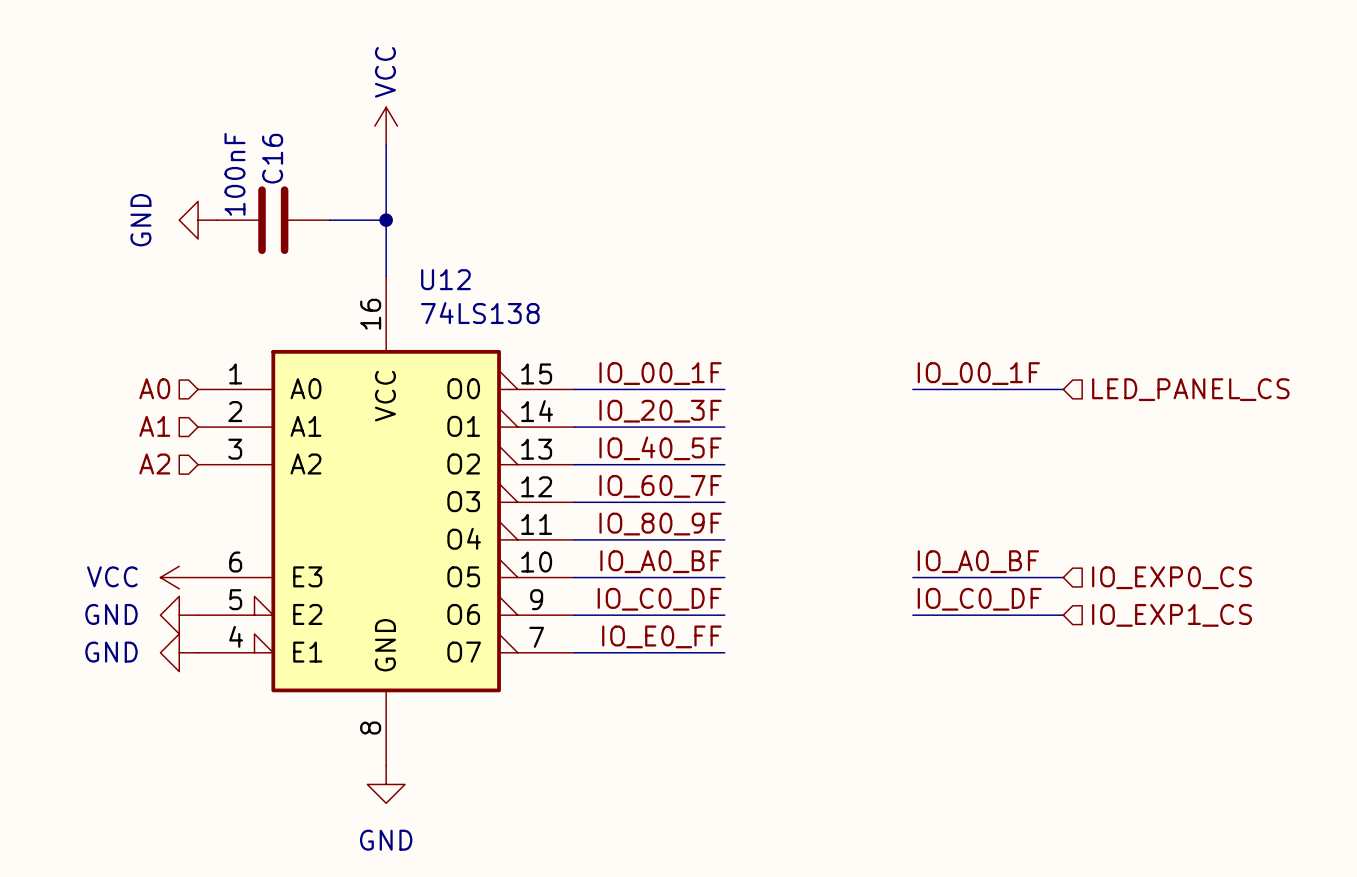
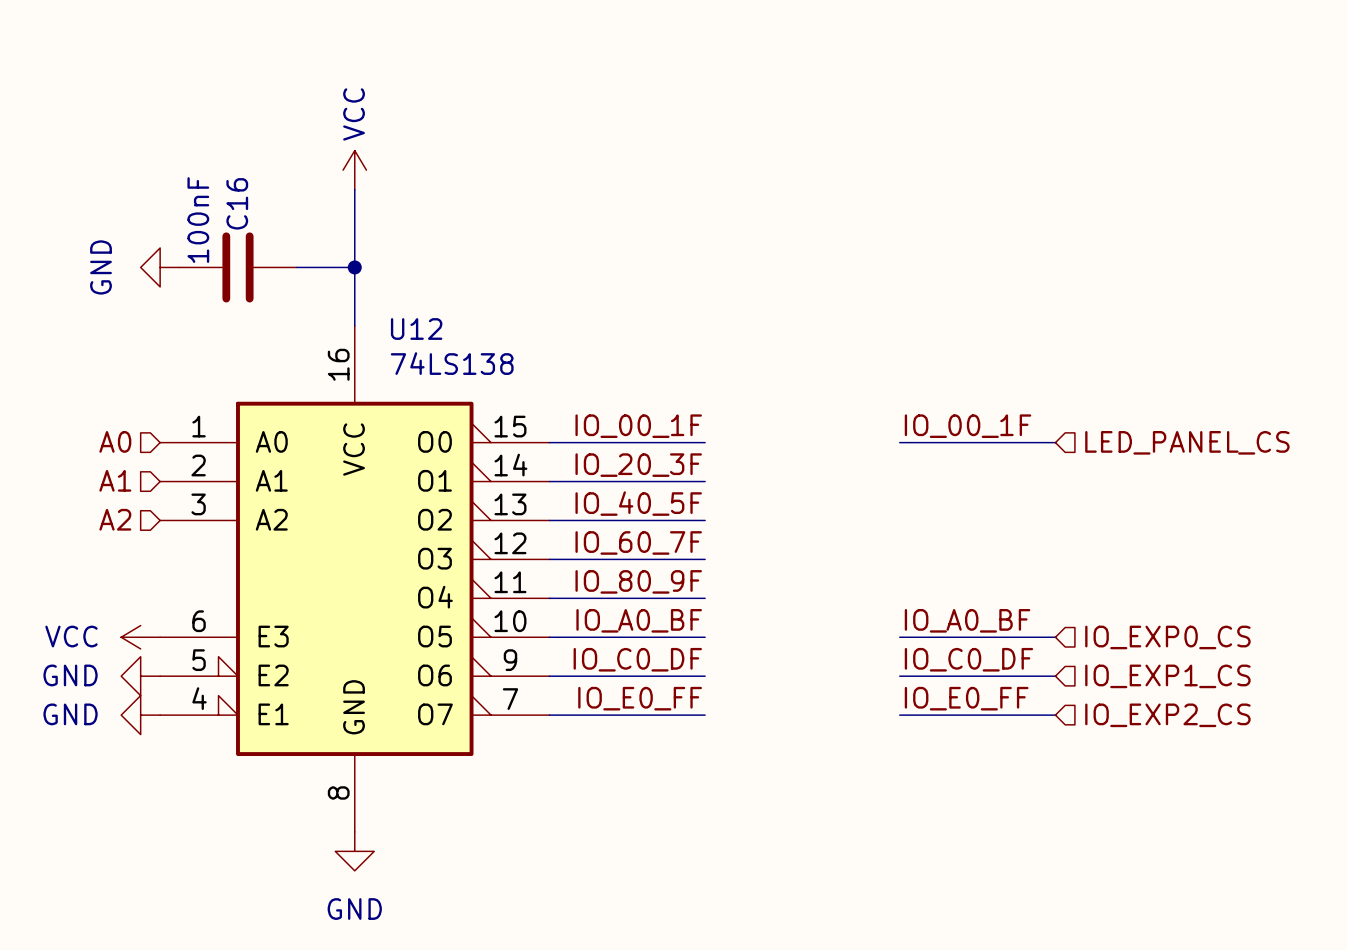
label: none -> IO_E0_FF (966, 698)
wire: none -> (899, 715) (1055, 715)
hierarchical label: none -> IO_EXP2_CS (1167, 715)

